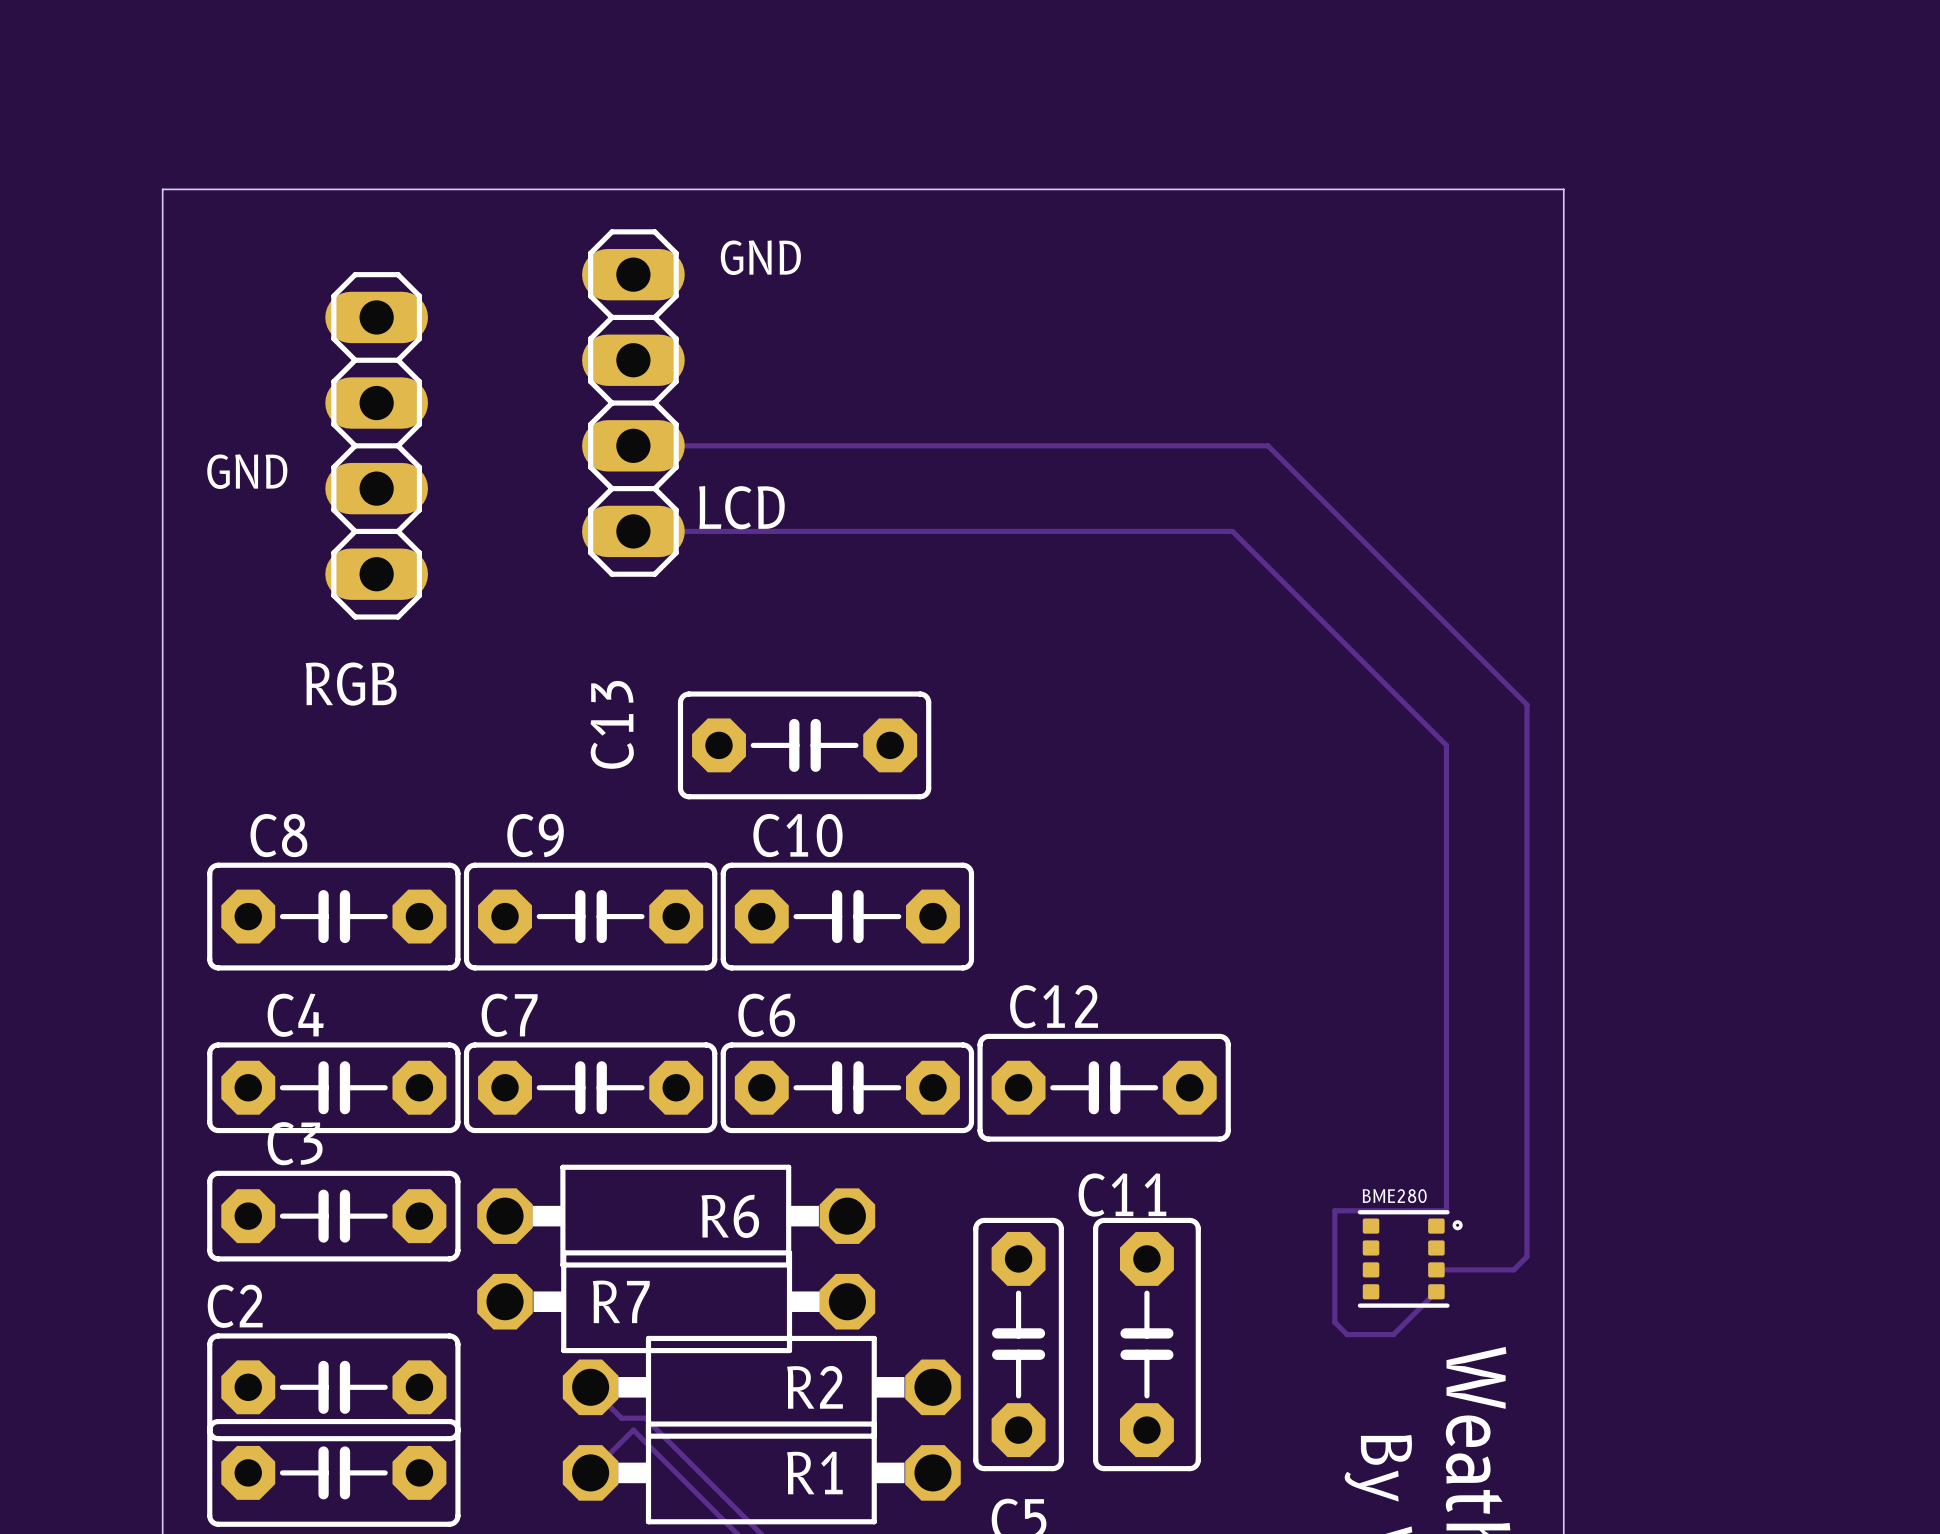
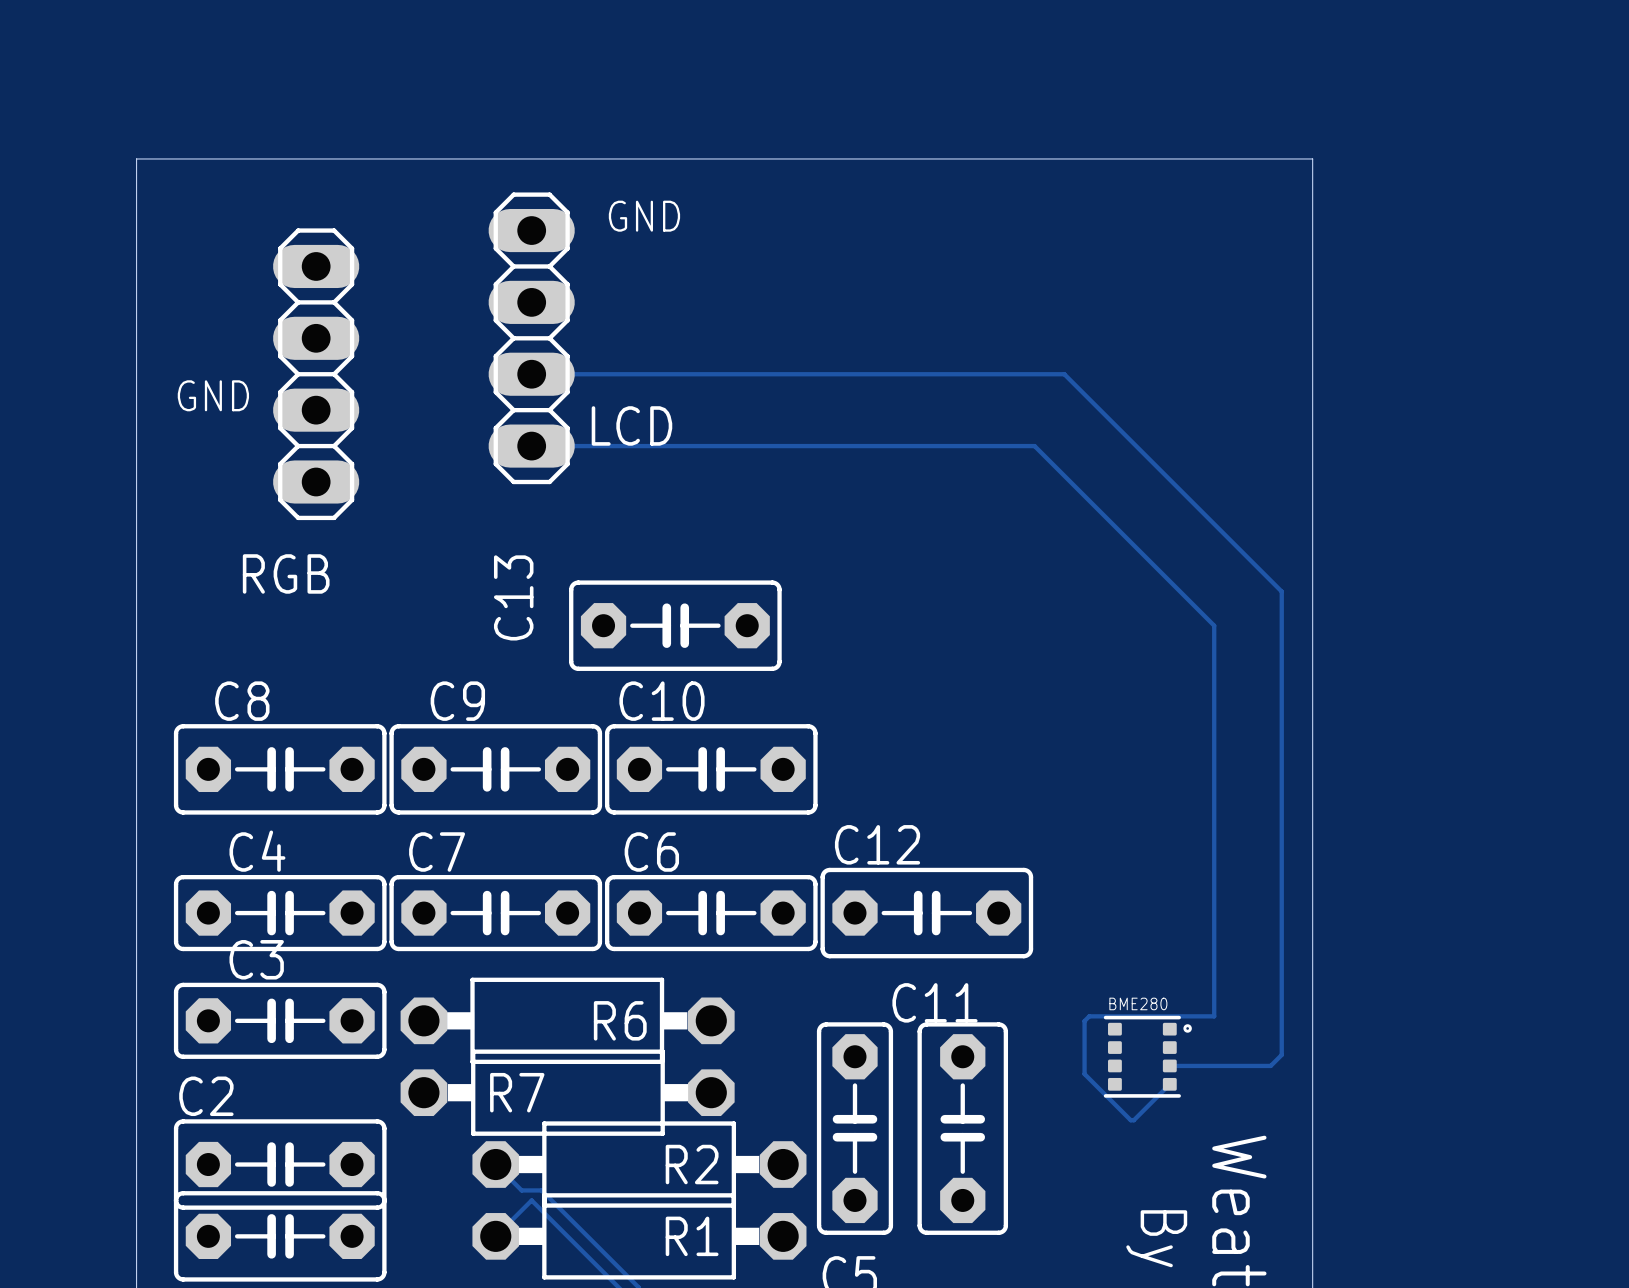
track: (1334, 1210) (1334, 1322) -> (1120, 1016) (1089, 1016) (1084, 1021) (1084, 1074) (1120, 1109)
BME280 position: (1410, 1258) -> (1147, 1056)
track: none -> (1169, 1065) (1205, 1065)
track: (1437, 1293) (1436, 1291) (1393, 1334) (1350, 1334) -> (1171, 1085) (1169, 1084) (1133, 1120)

